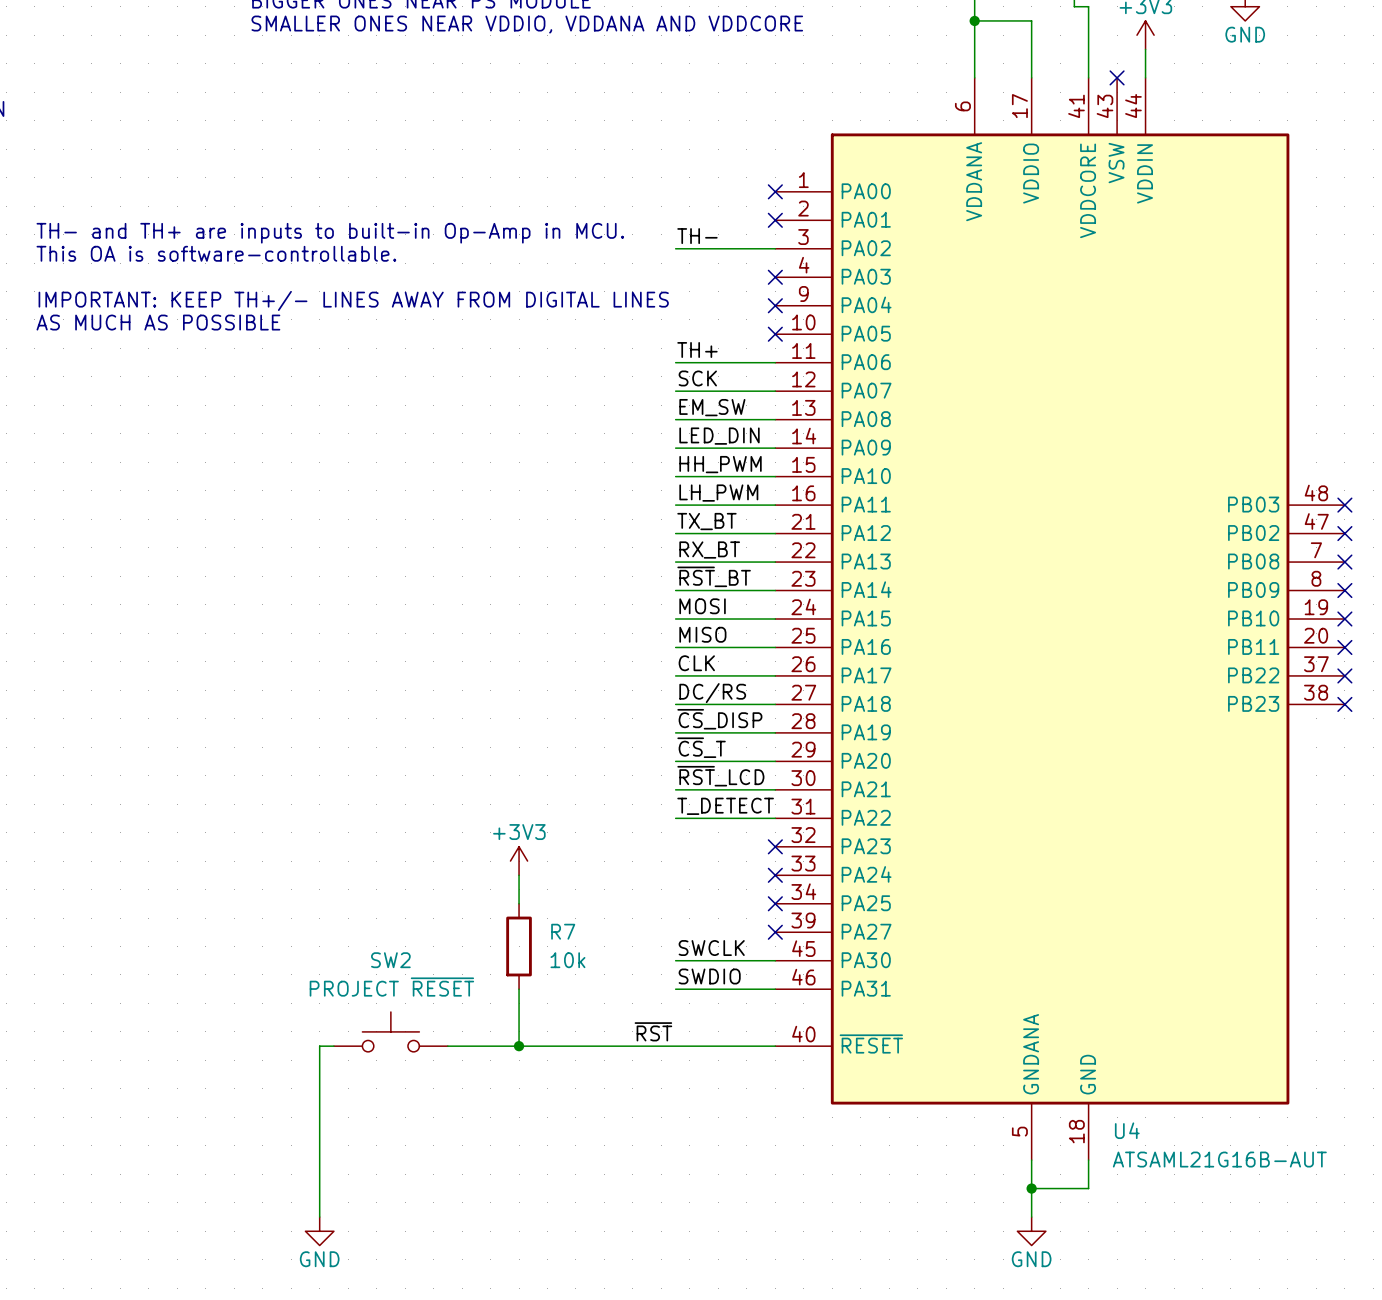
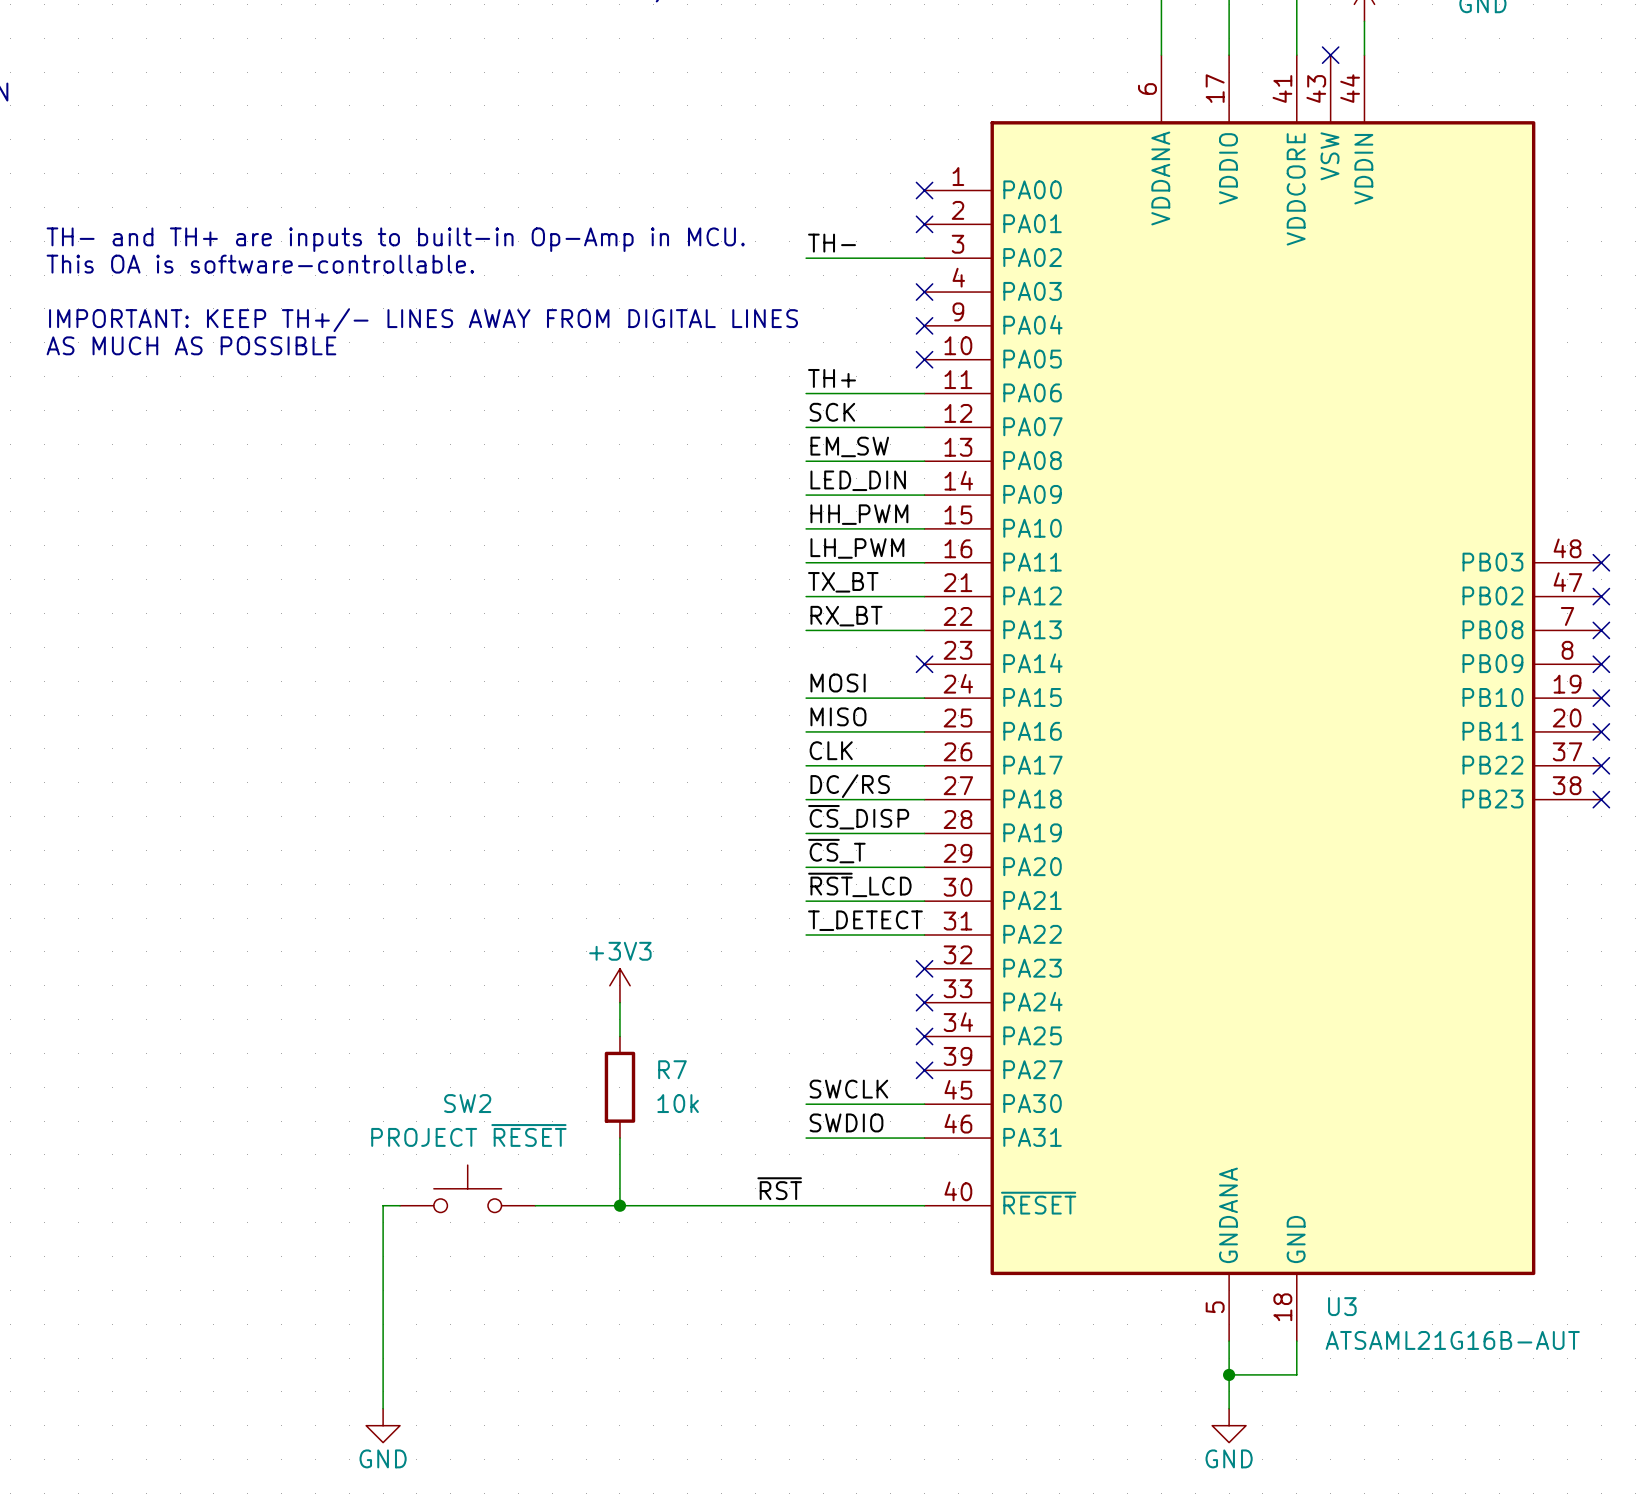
label: ~{RST}_BT (714, 576) -> none
wire: (675, 590) (775, 590) -> none
no-connect mark: none -> (924, 664)
U4 name: U4 (1127, 1130) -> U3 (1342, 1306)

